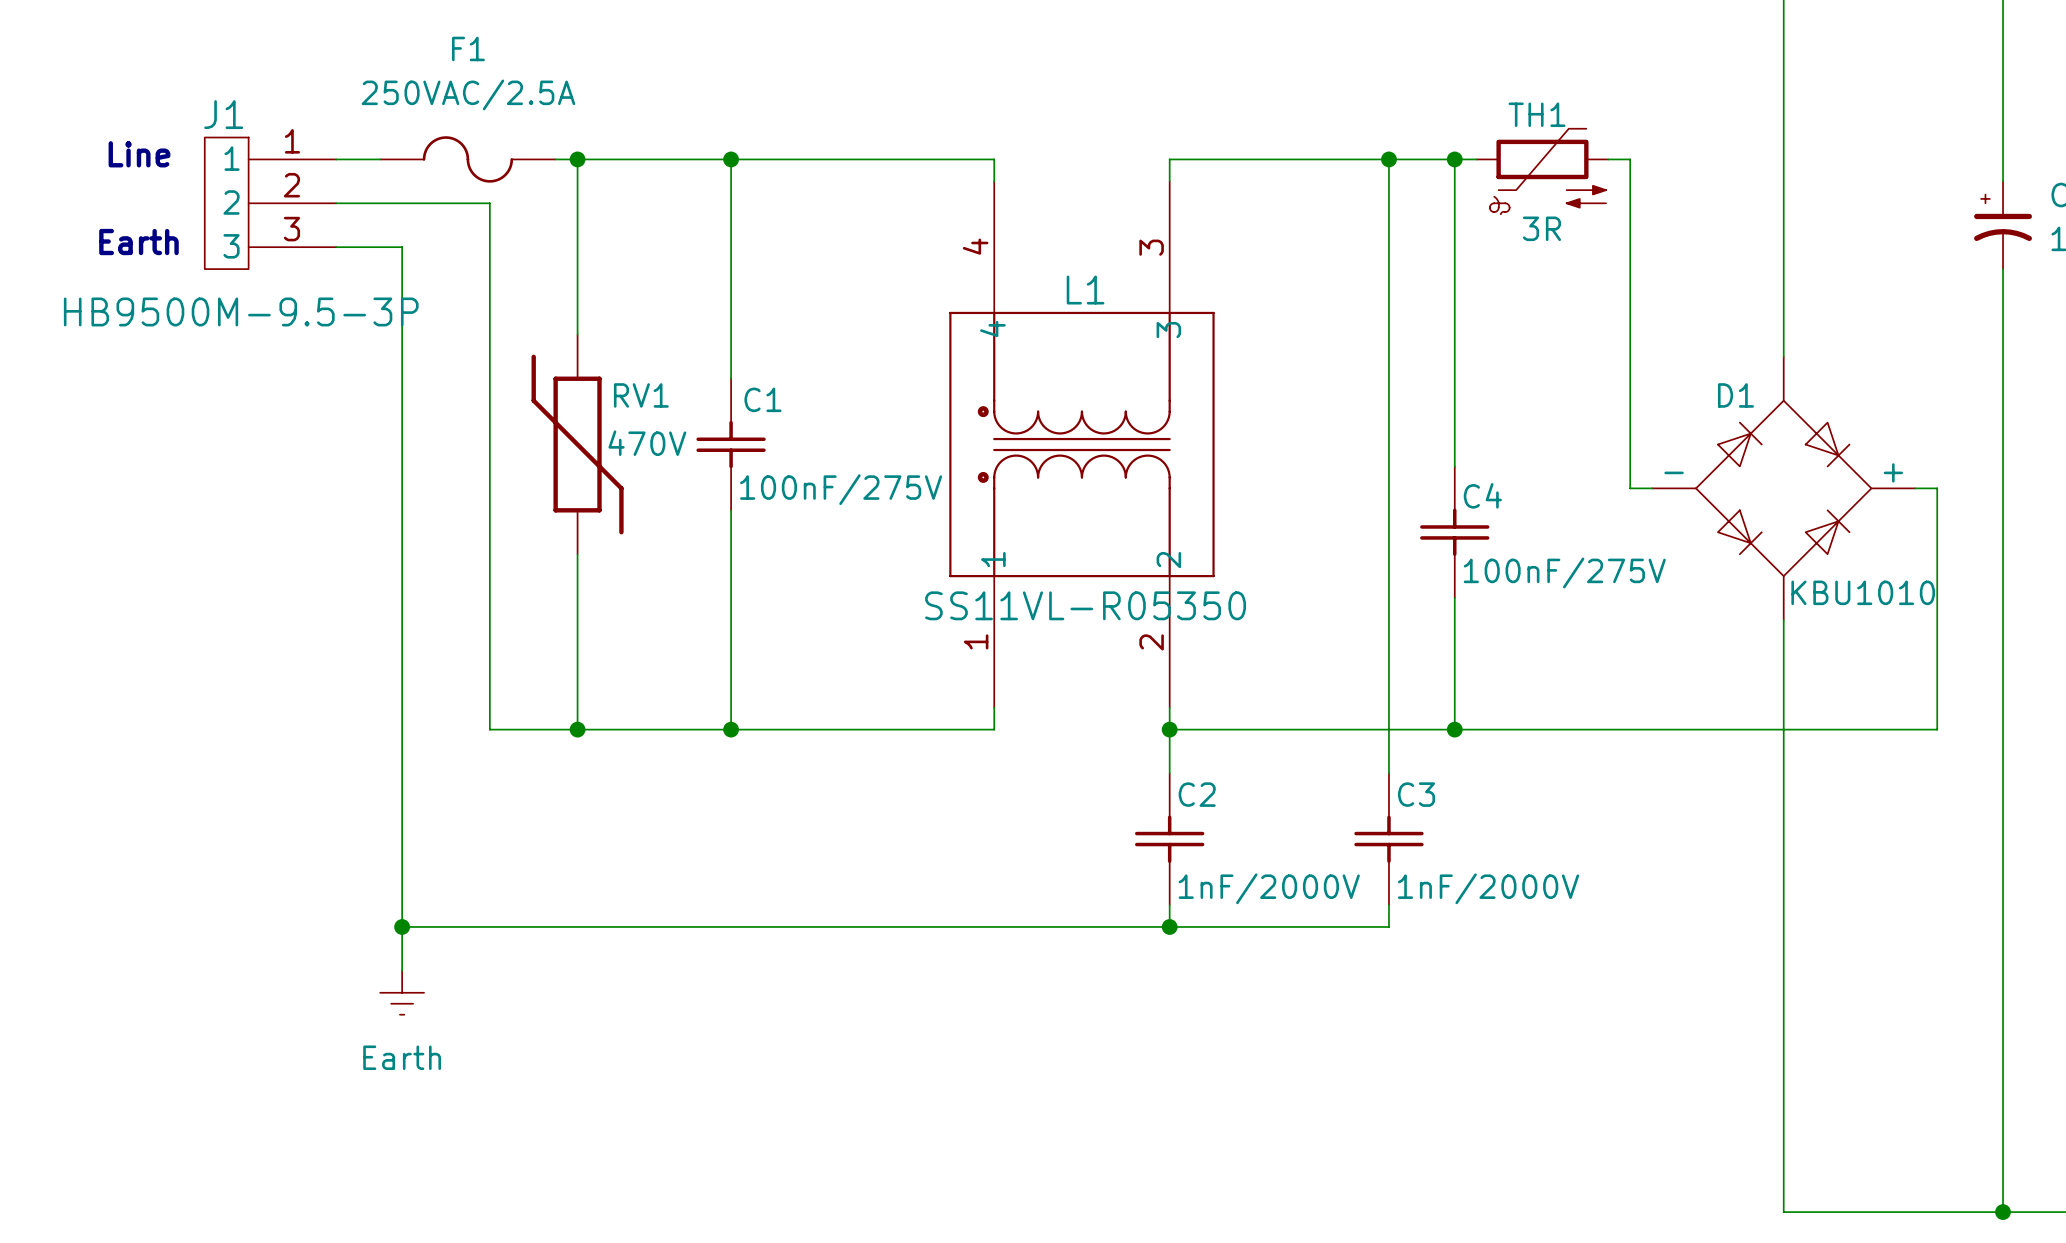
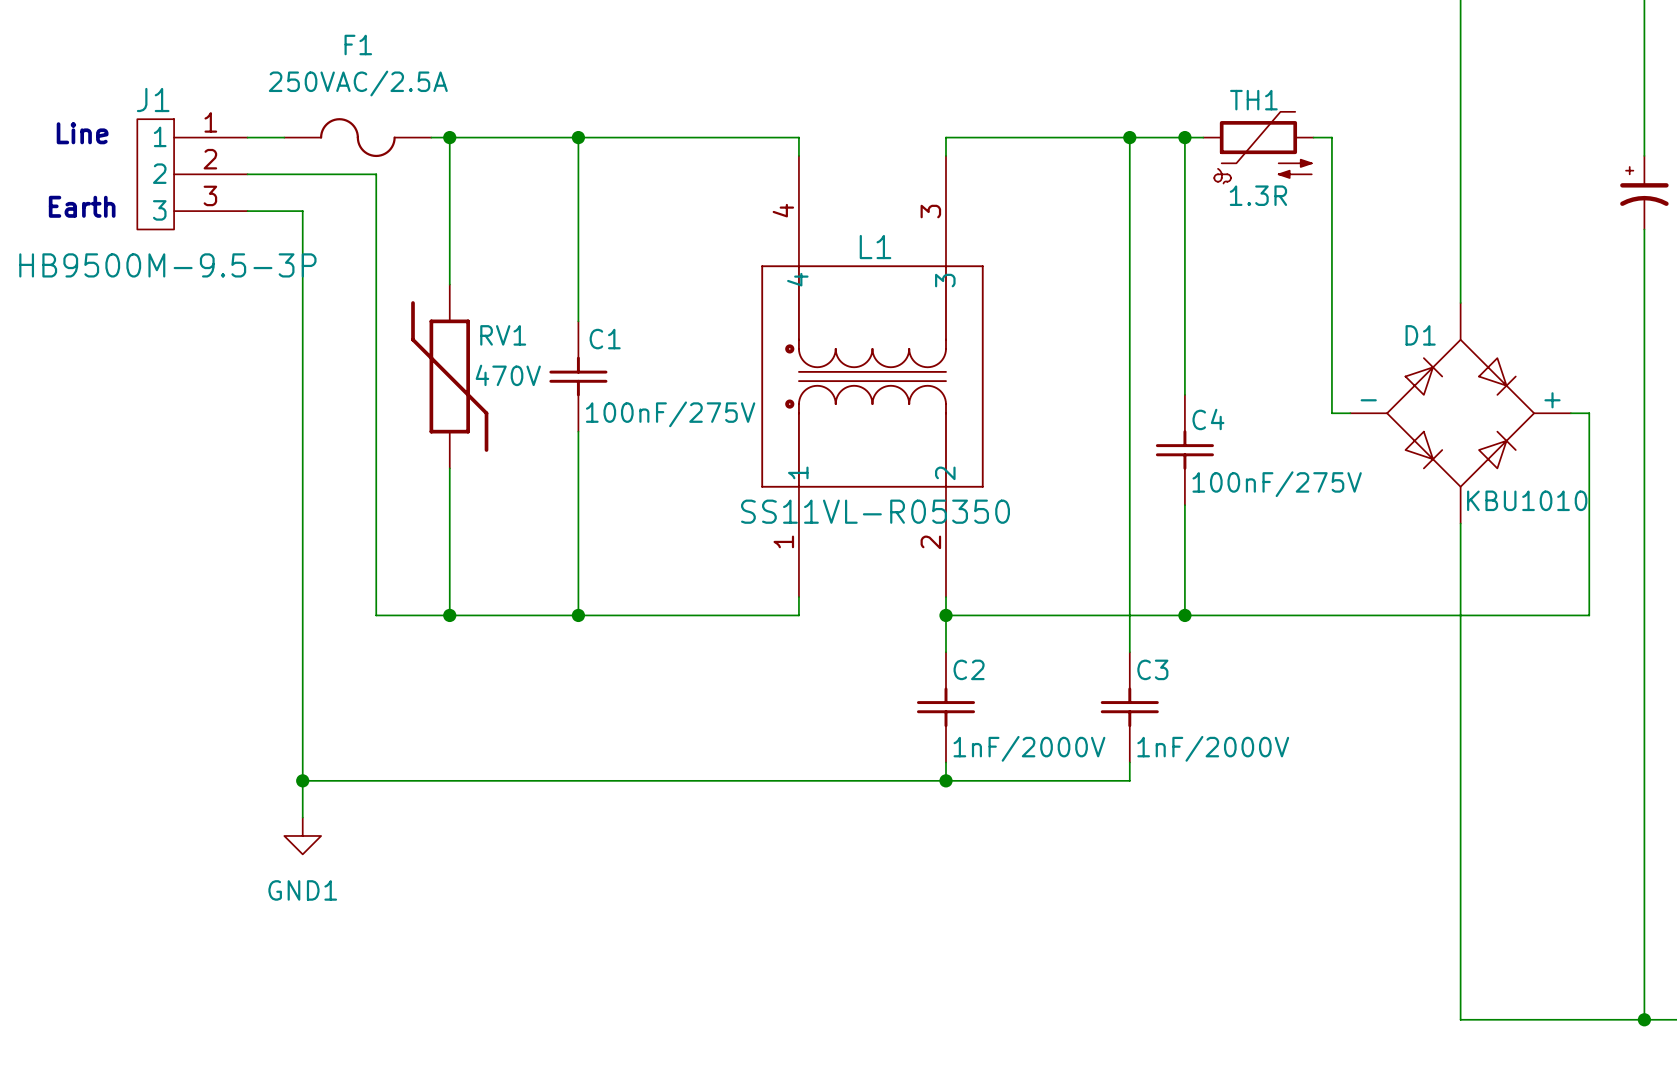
TH1 value: 3R (1541, 228) -> 1.3R (1258, 195)
power symbol: Earth (402, 992) -> GND1 (302, 835)

